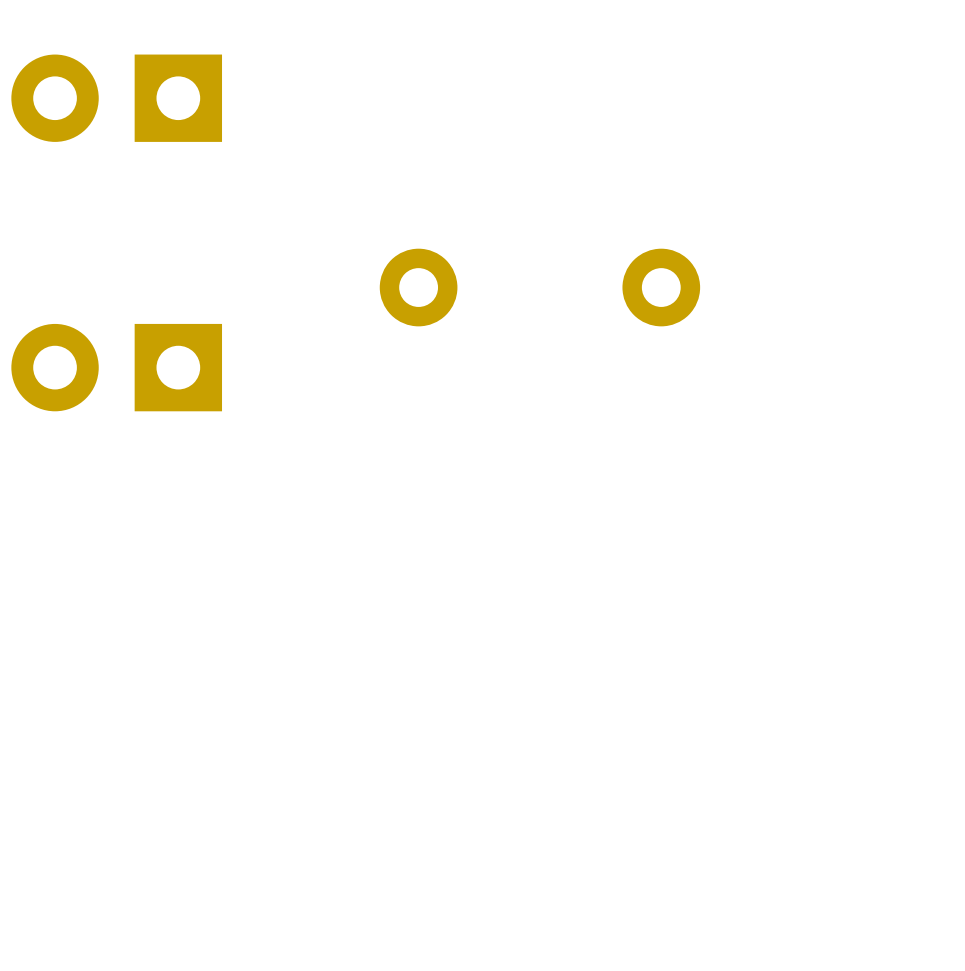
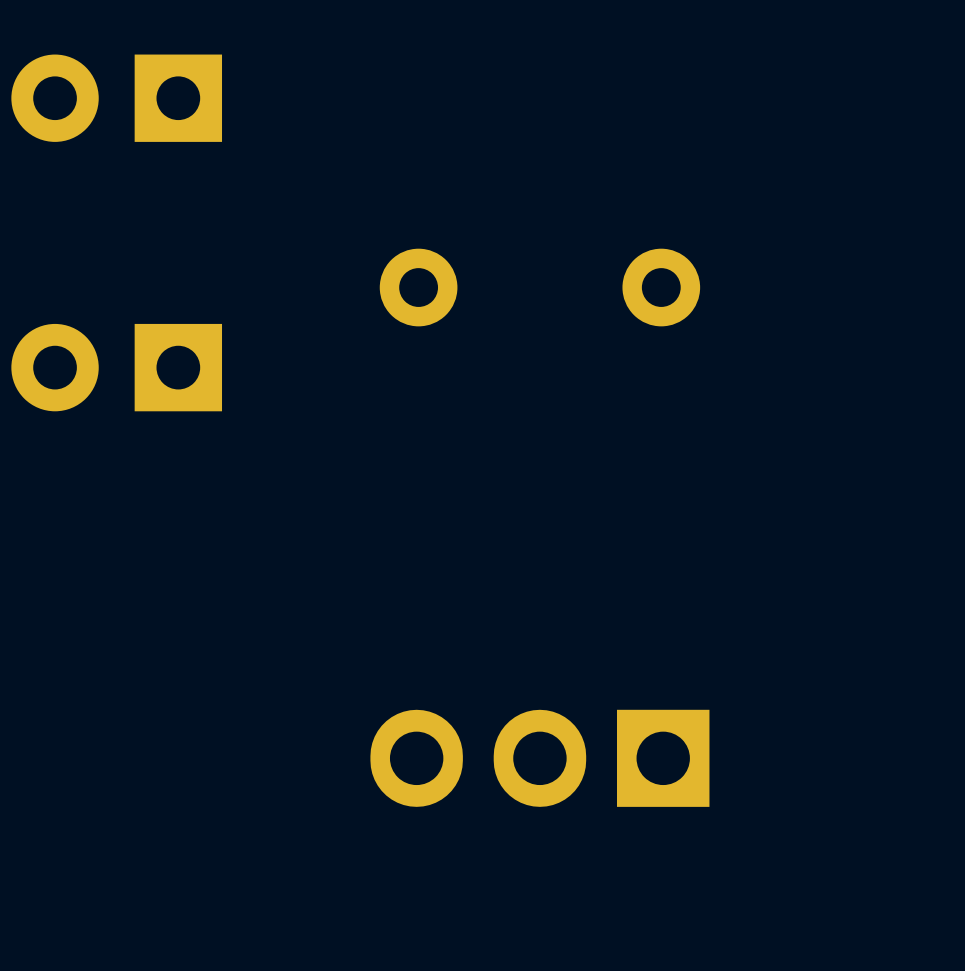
part: none -> (539, 758)

